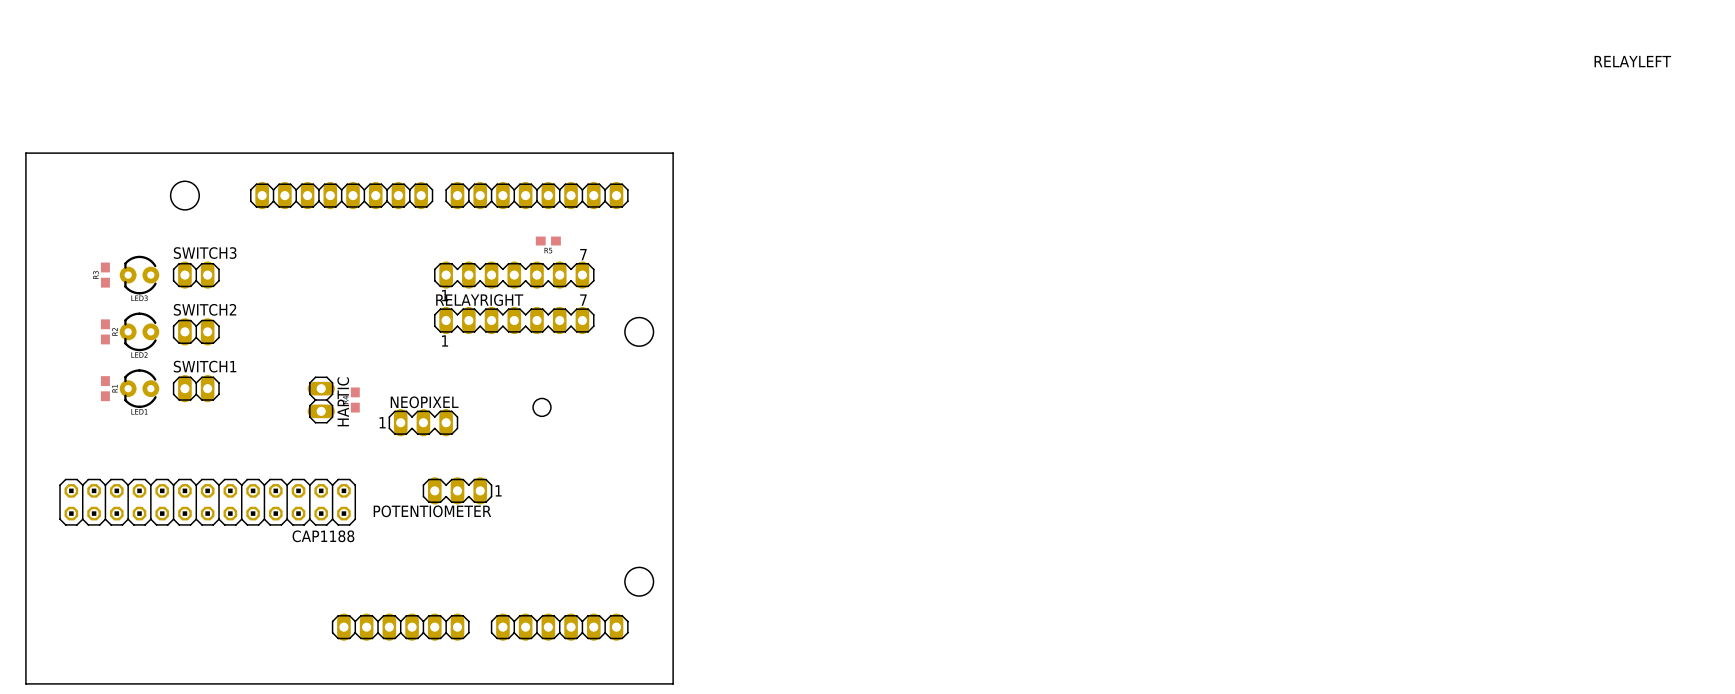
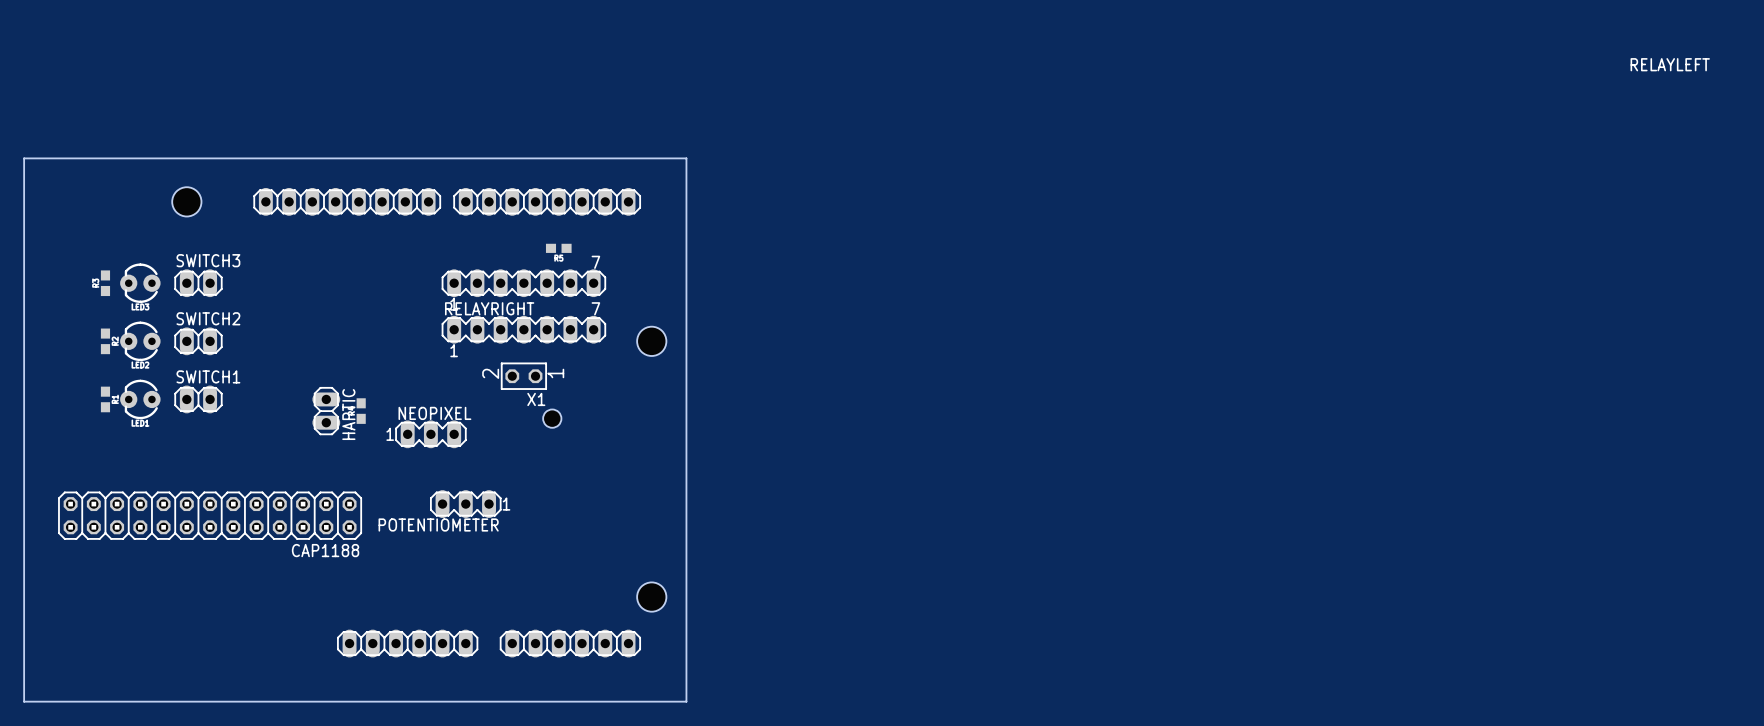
X1: none -> (523, 376)

